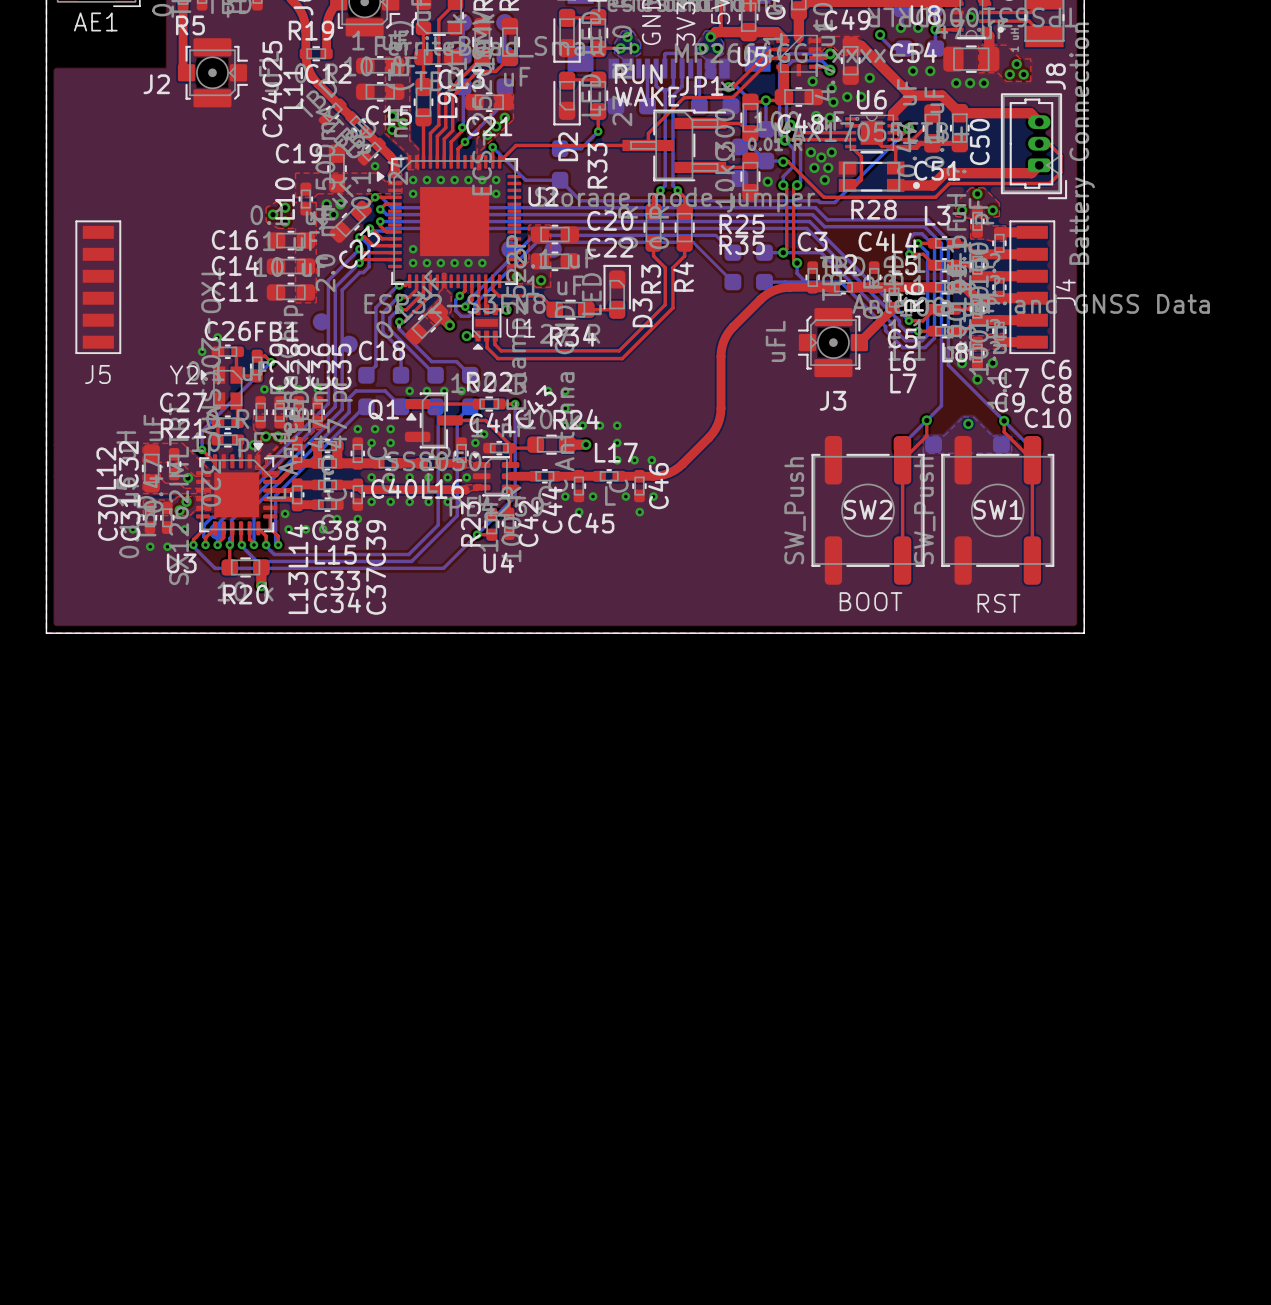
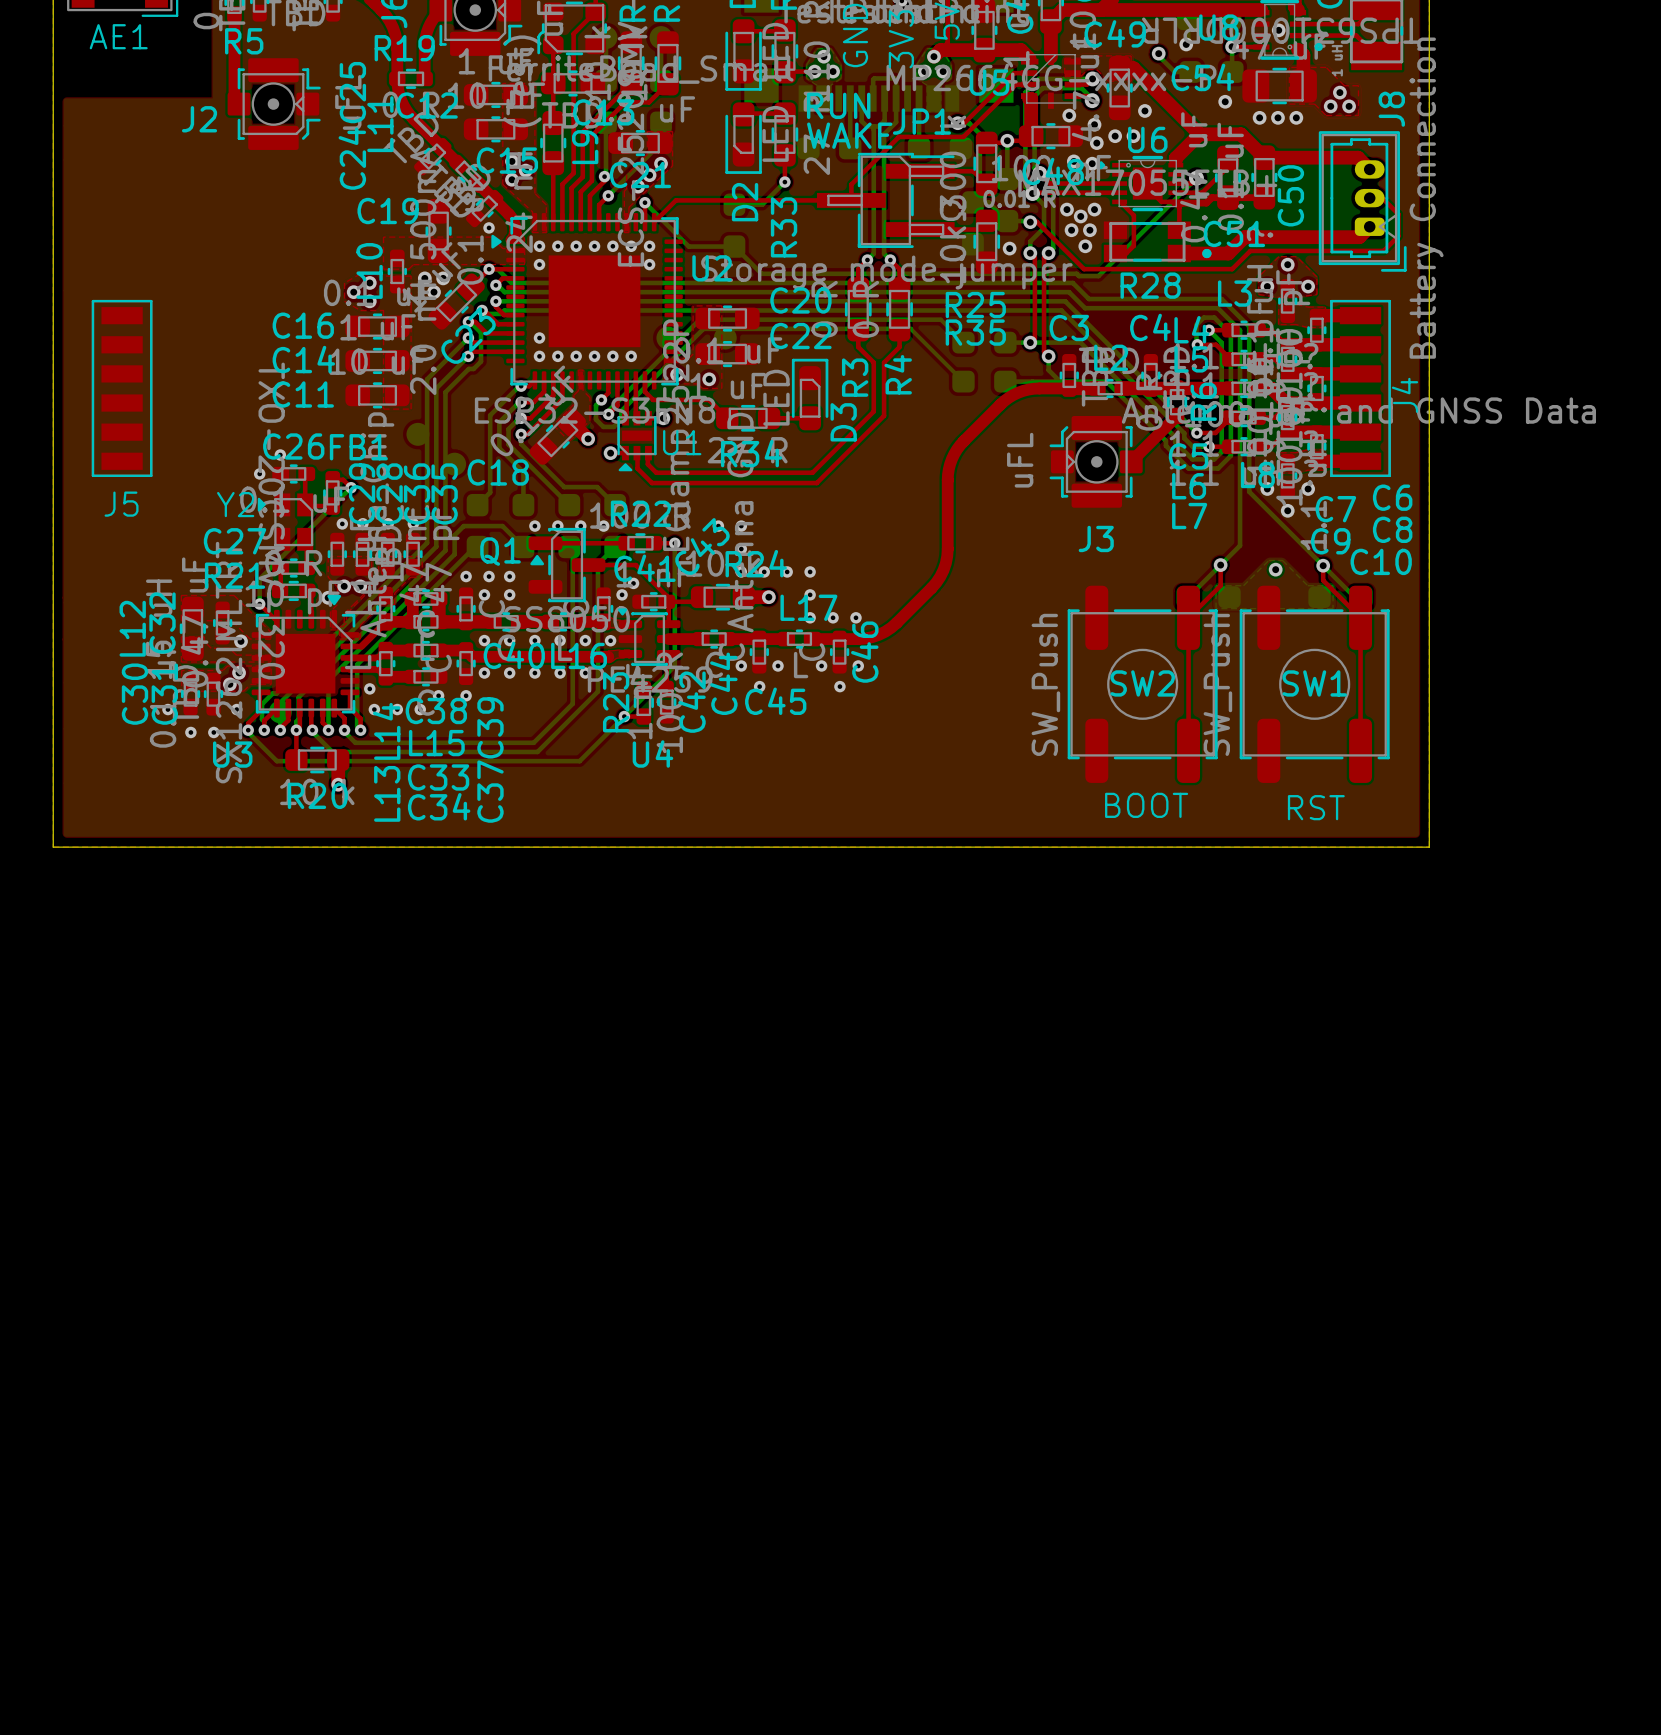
via: (918, 27) -> none
via: (913, 71) -> none

